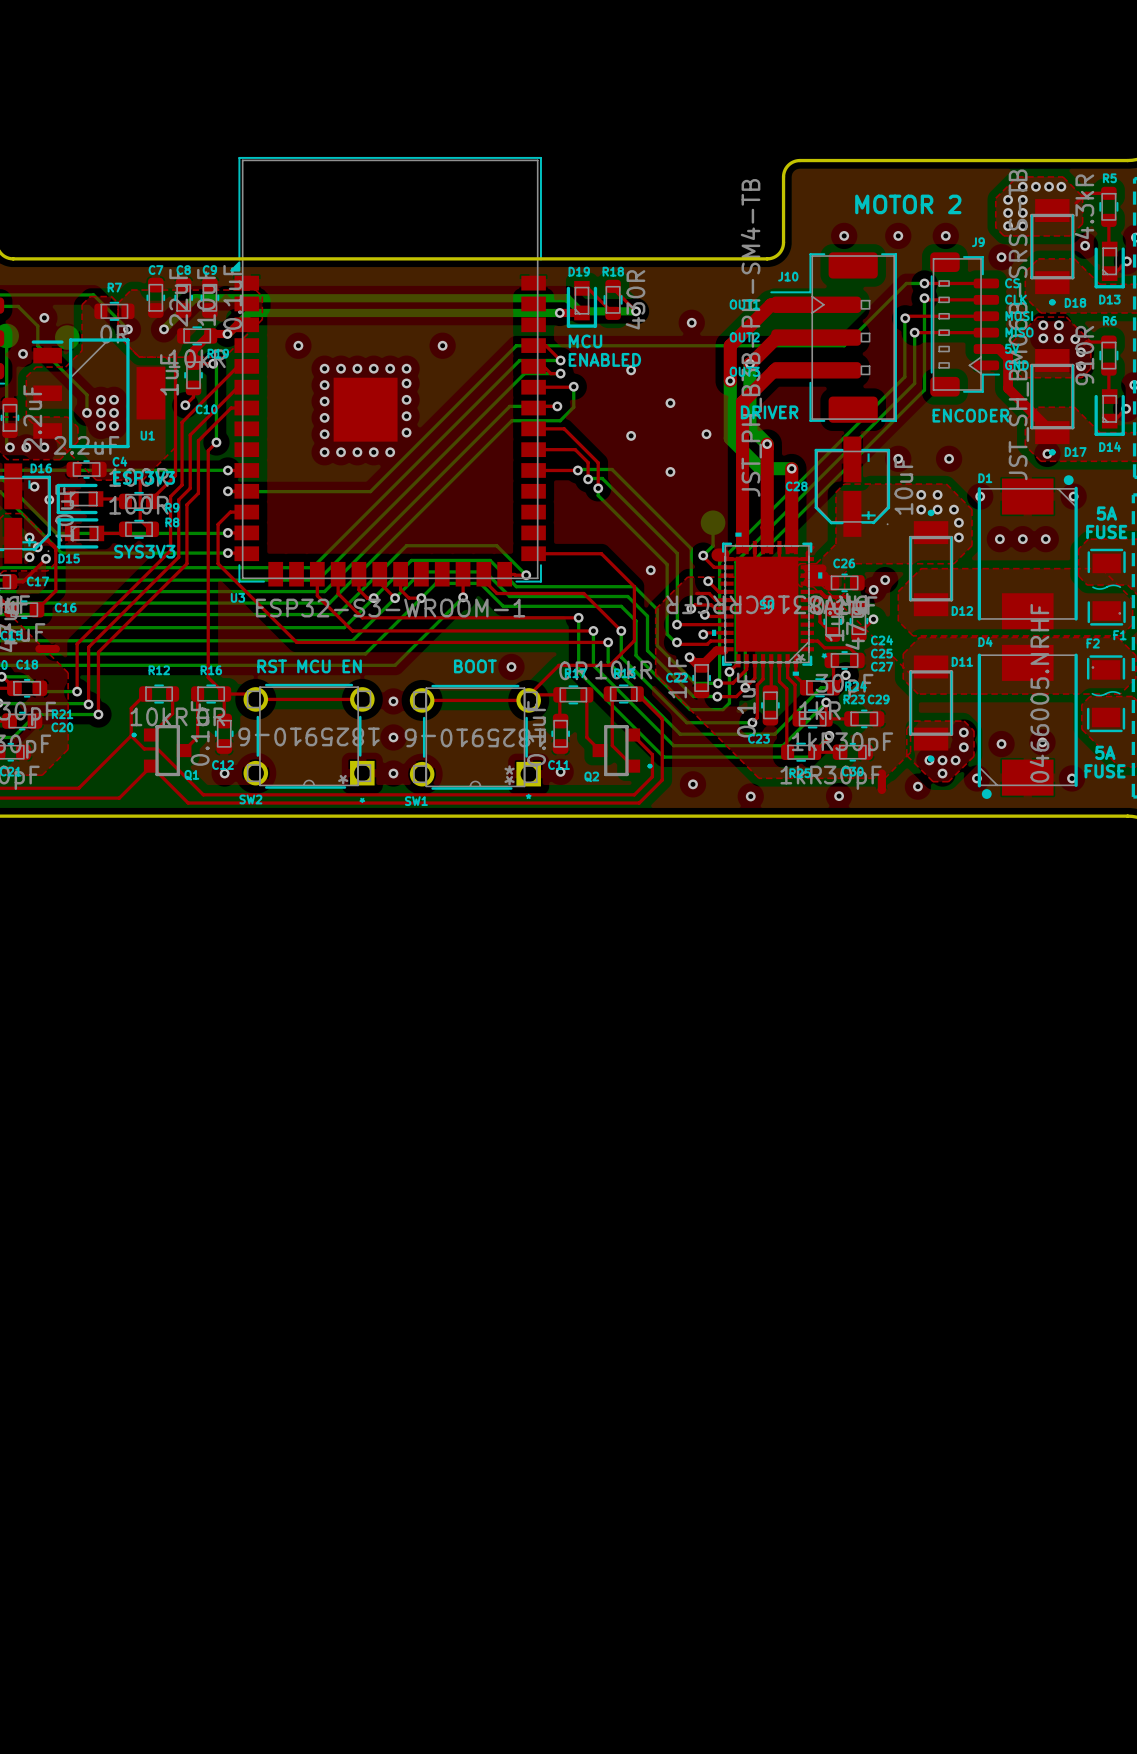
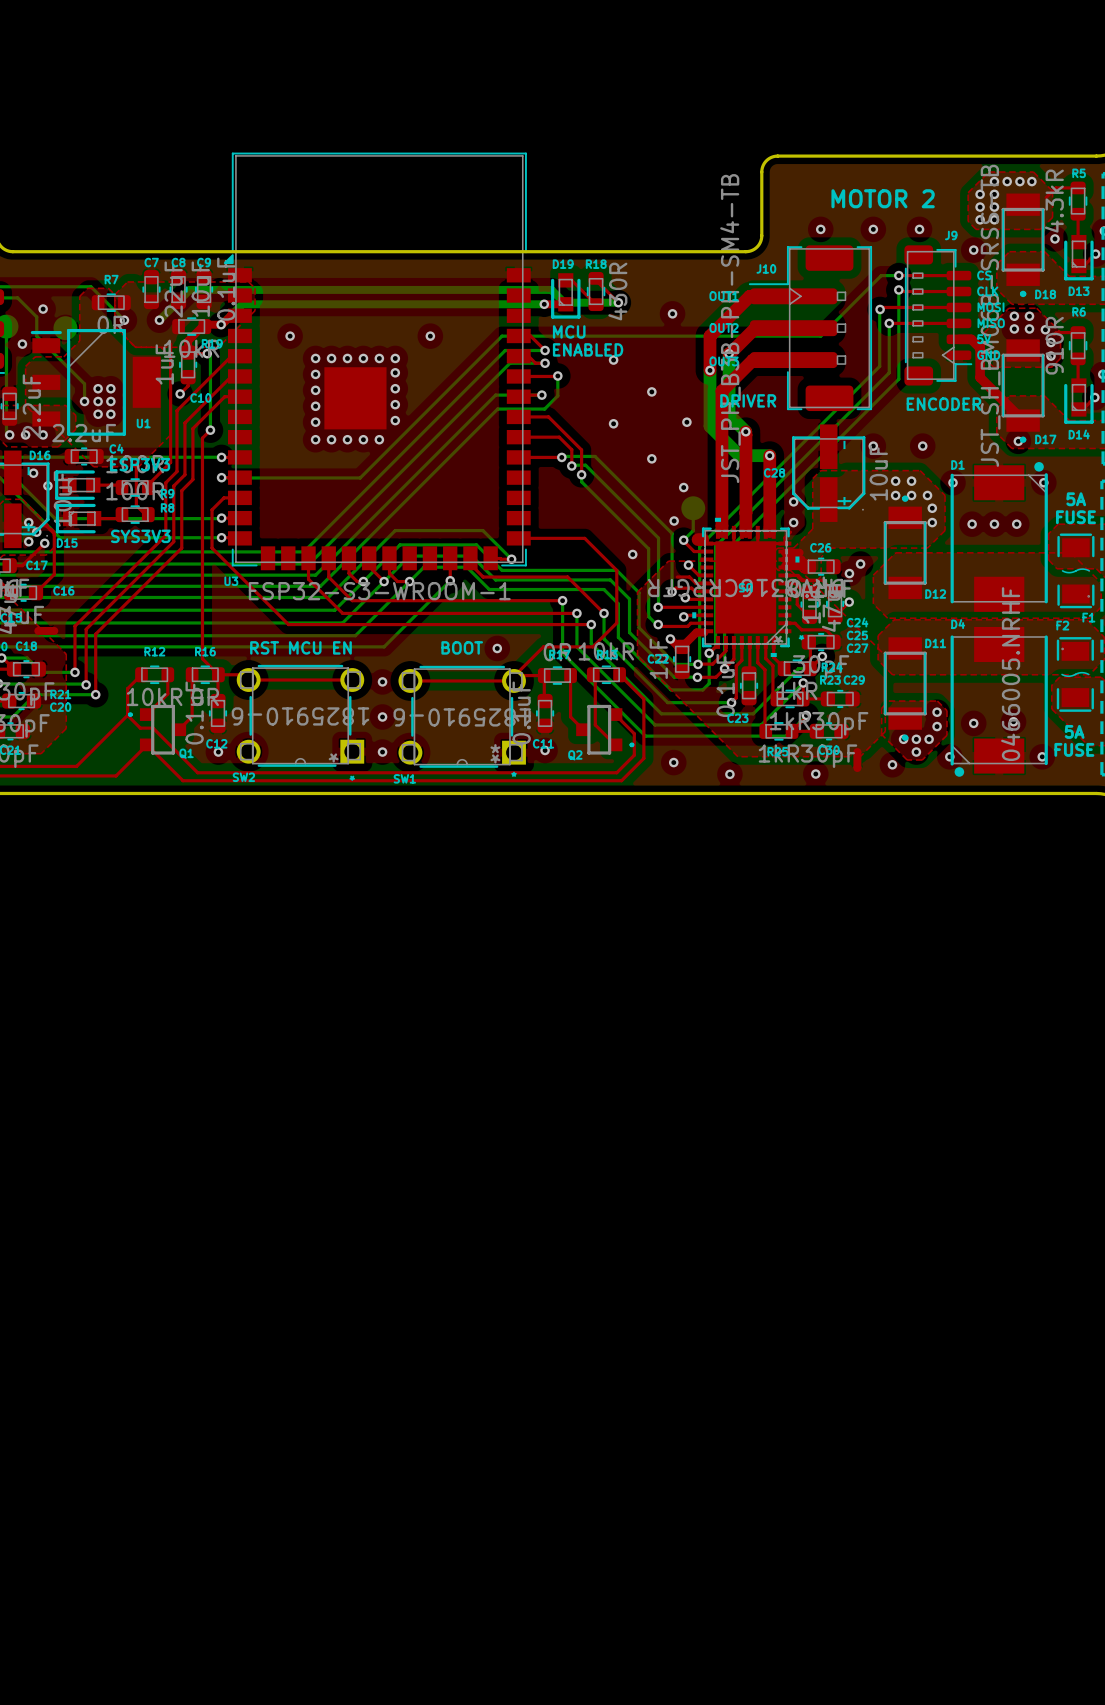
via: none -> (683, 487)
via: none -> (793, 501)
via: none -> (674, 520)
via: none -> (793, 522)

